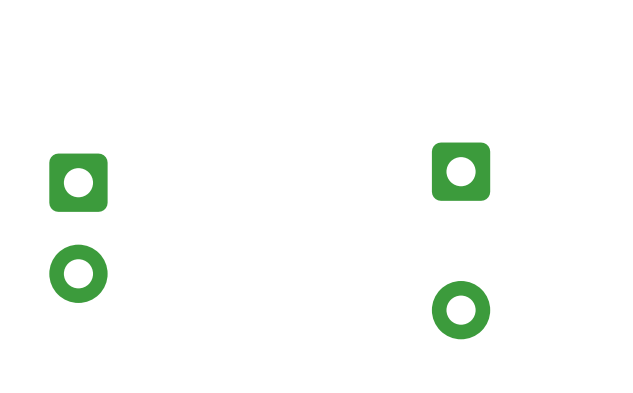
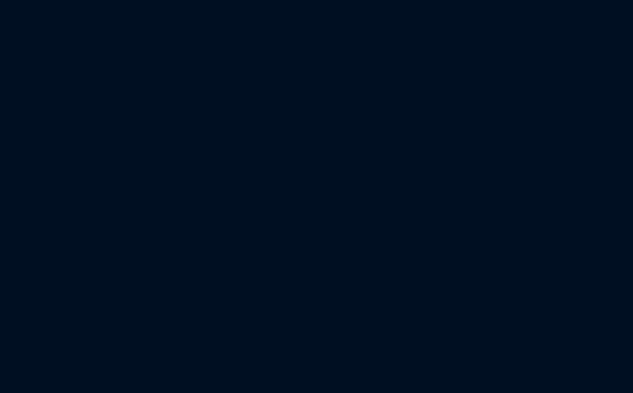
part: (78, 228) -> none
part: (461, 240) -> none

